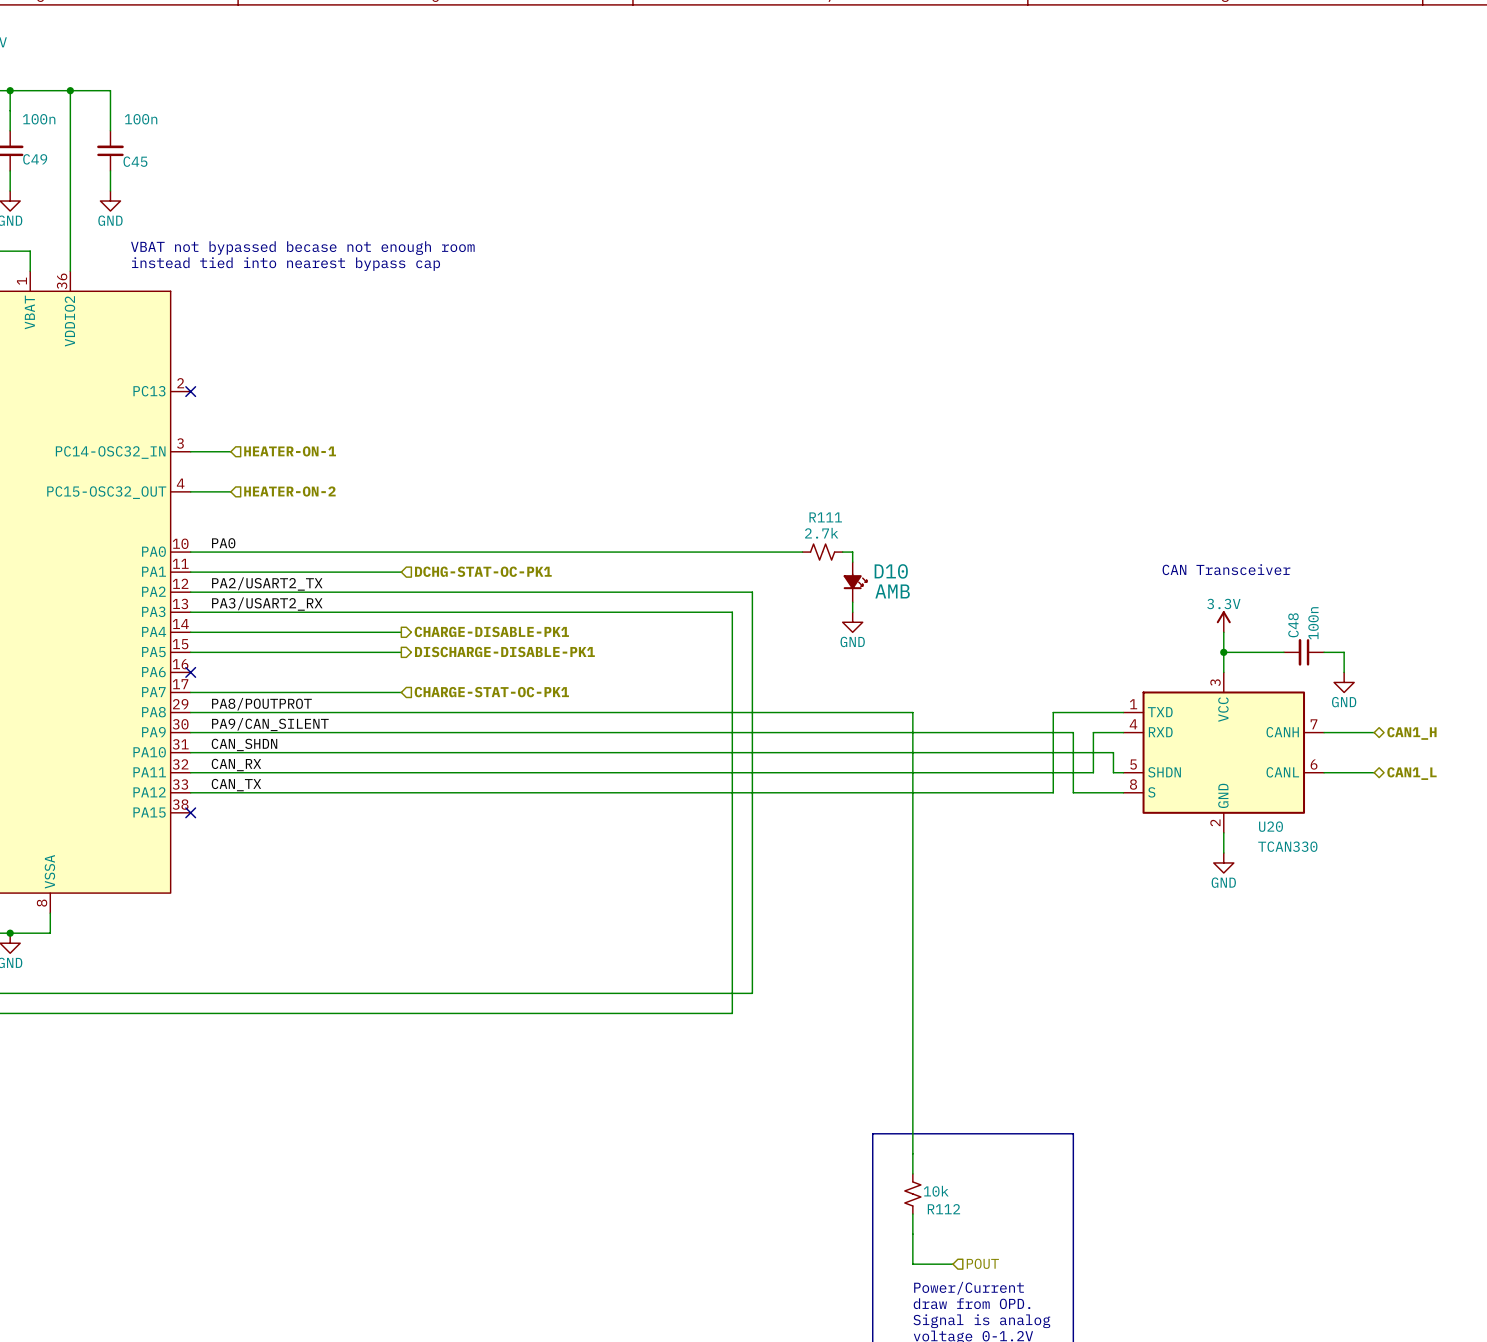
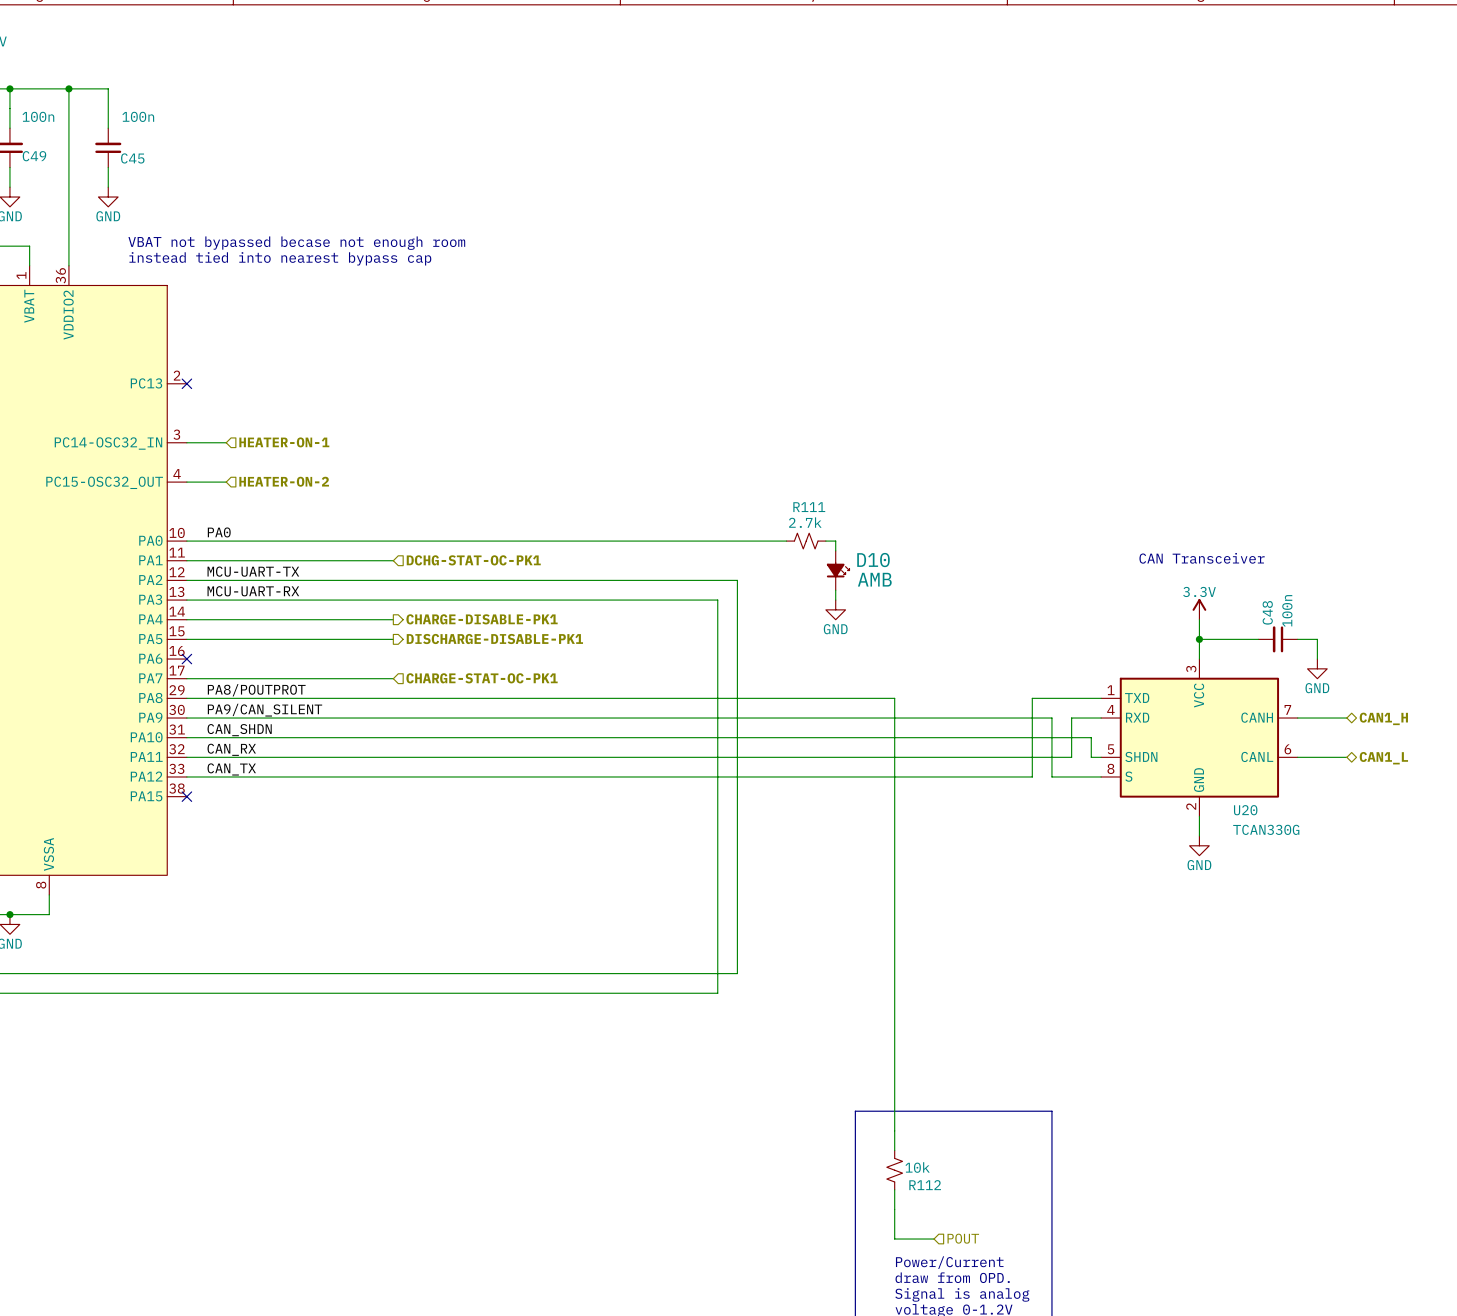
label: PA2/USART2_TX (267, 583) -> MCU-UART-TX (253, 571)
label: PA3/USART2_RX (267, 604) -> MCU-UART-RX (253, 591)
U20 value: TCAN330 (1287, 846) -> TCAN330G (1266, 829)

